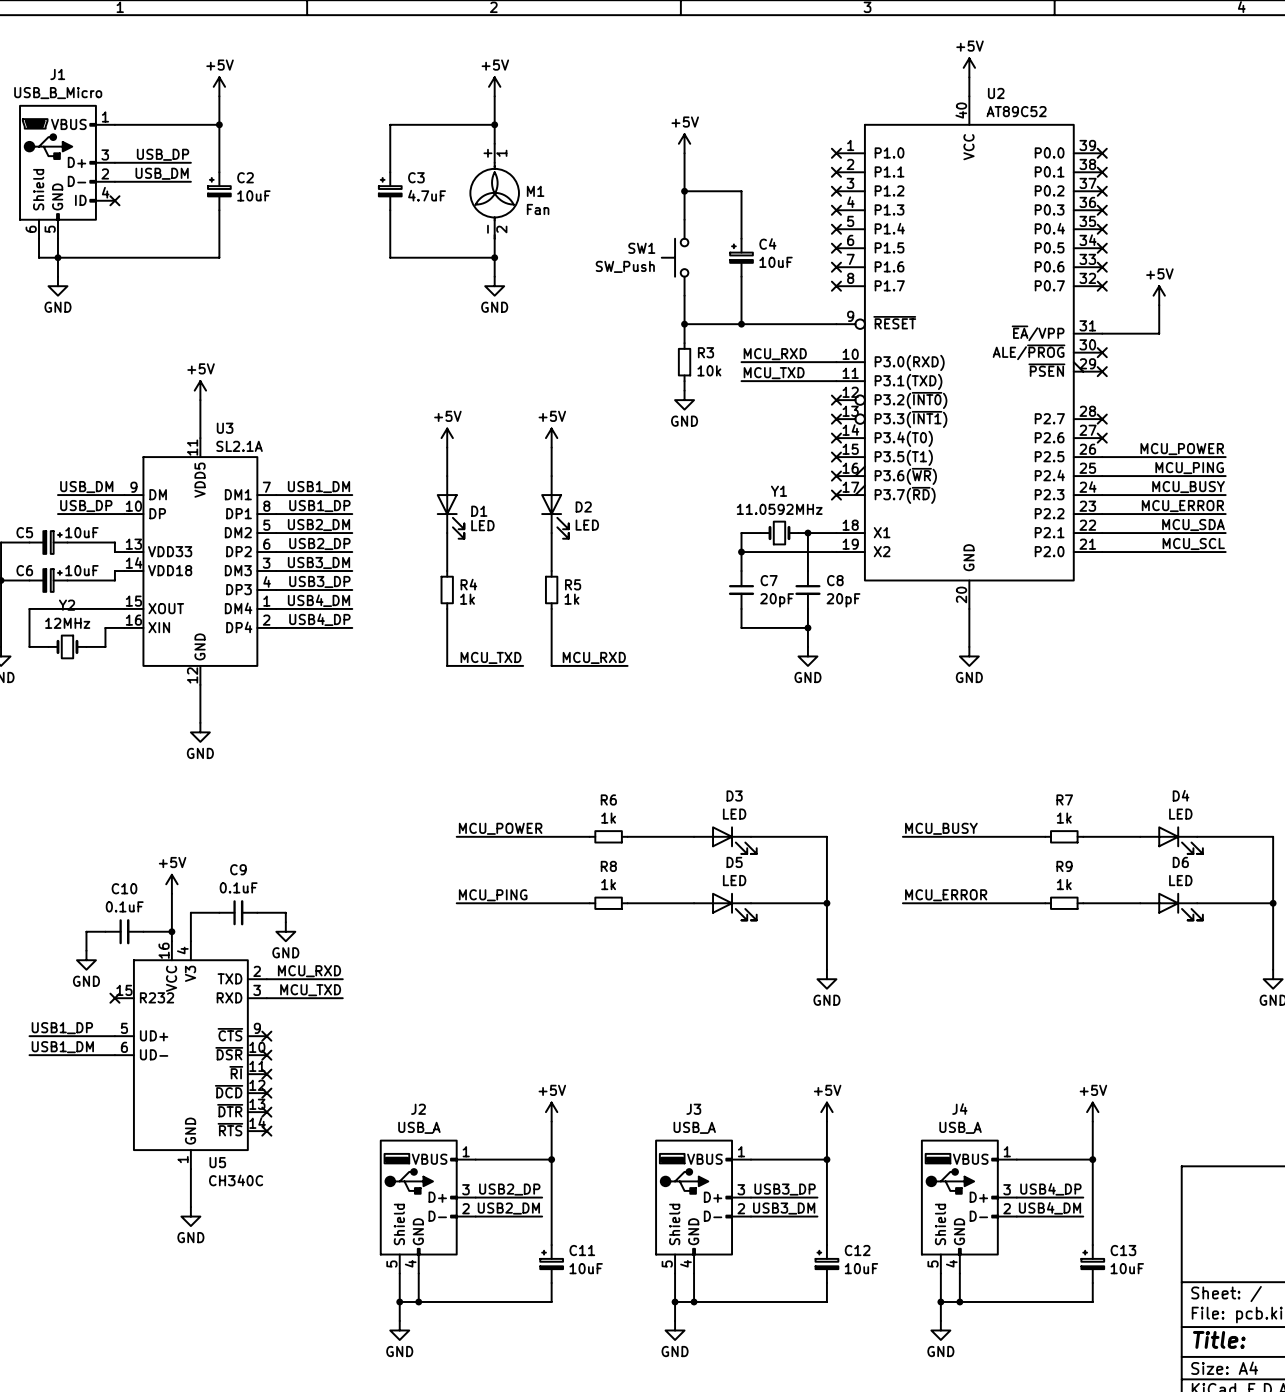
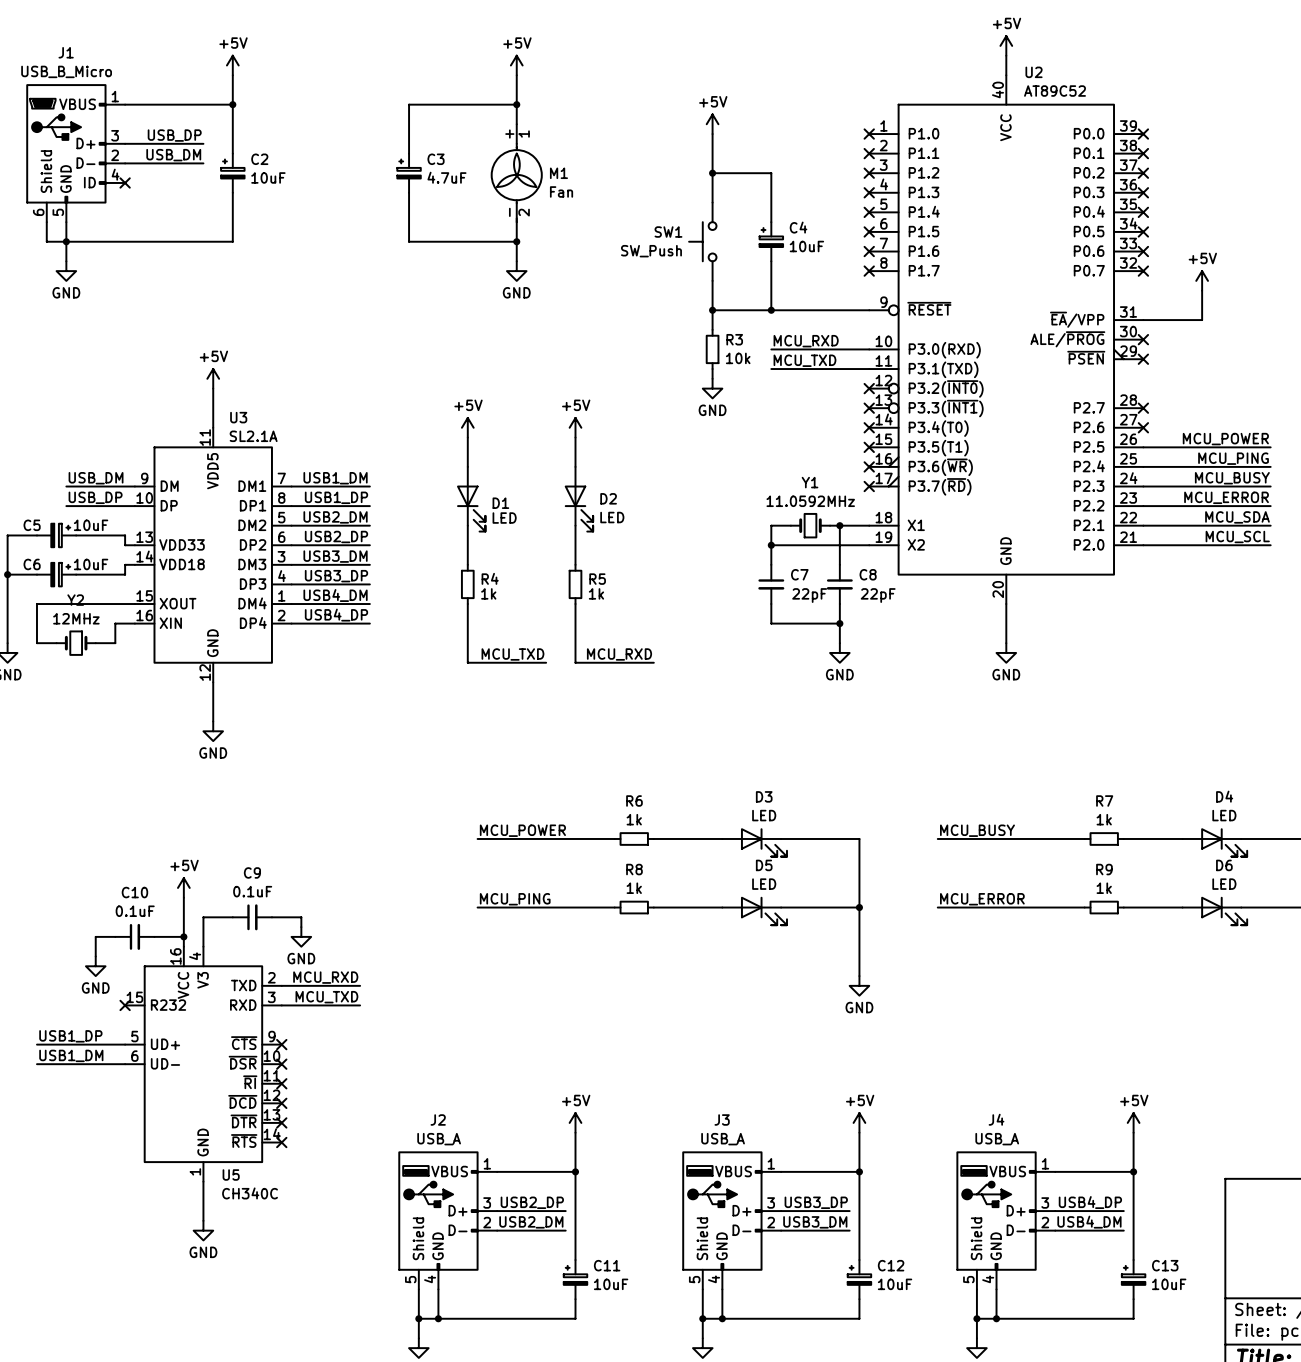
C7 value: 20pF (777, 600) -> 22pF (809, 595)
C8 value: 20pF (843, 600) -> 22pF (878, 595)

